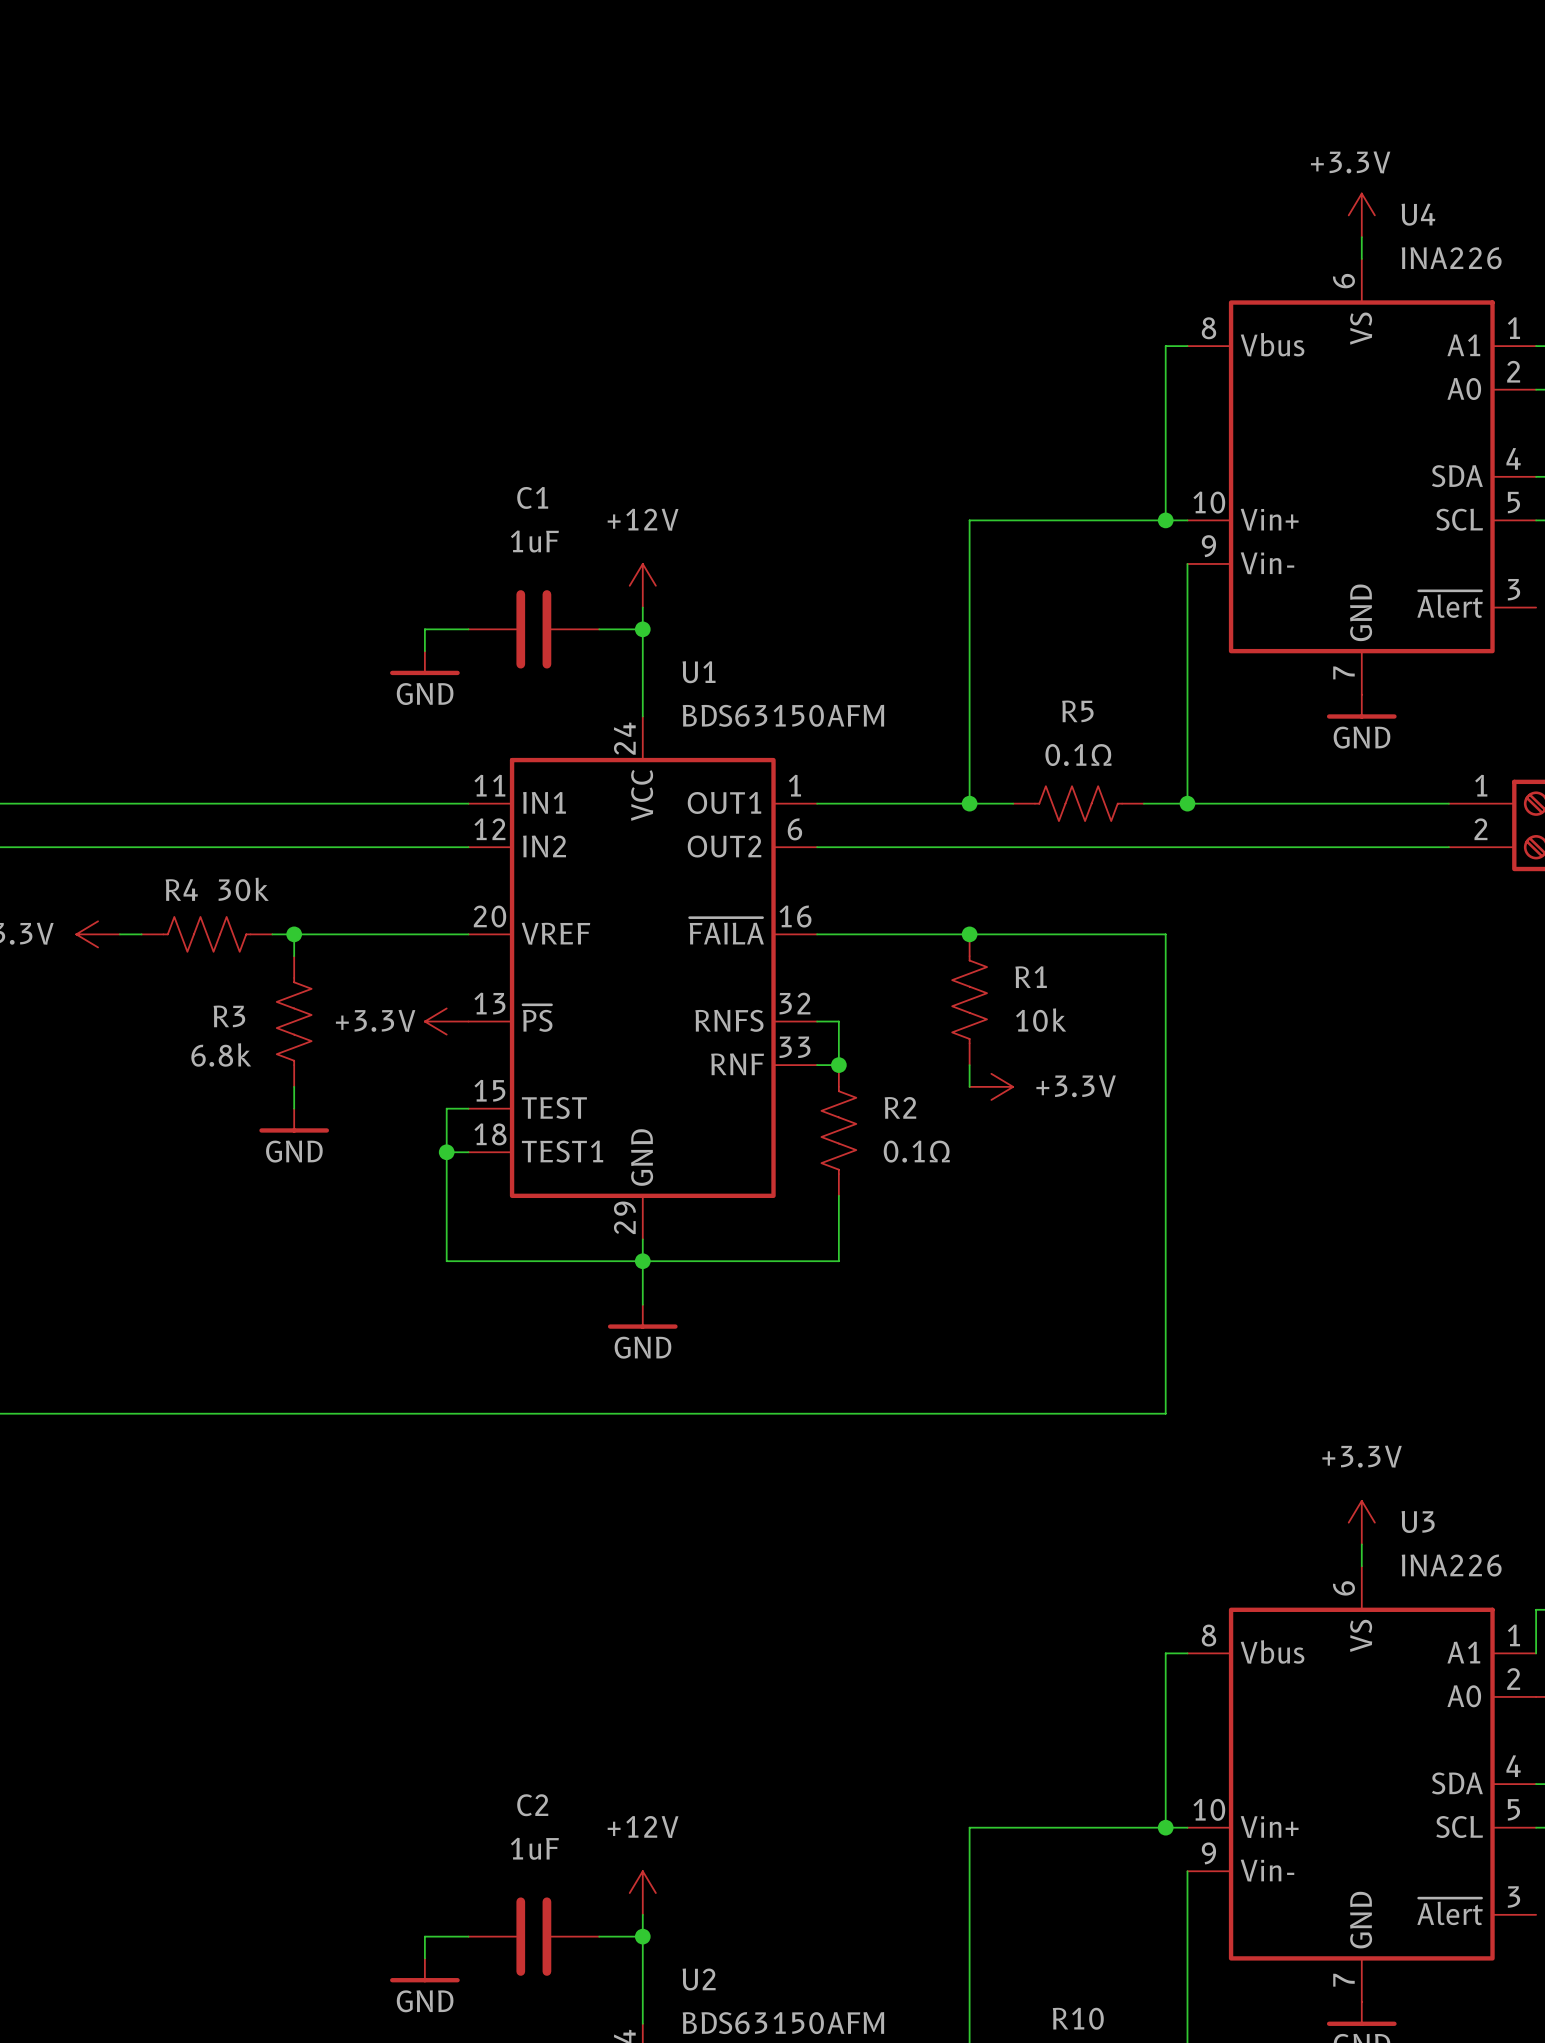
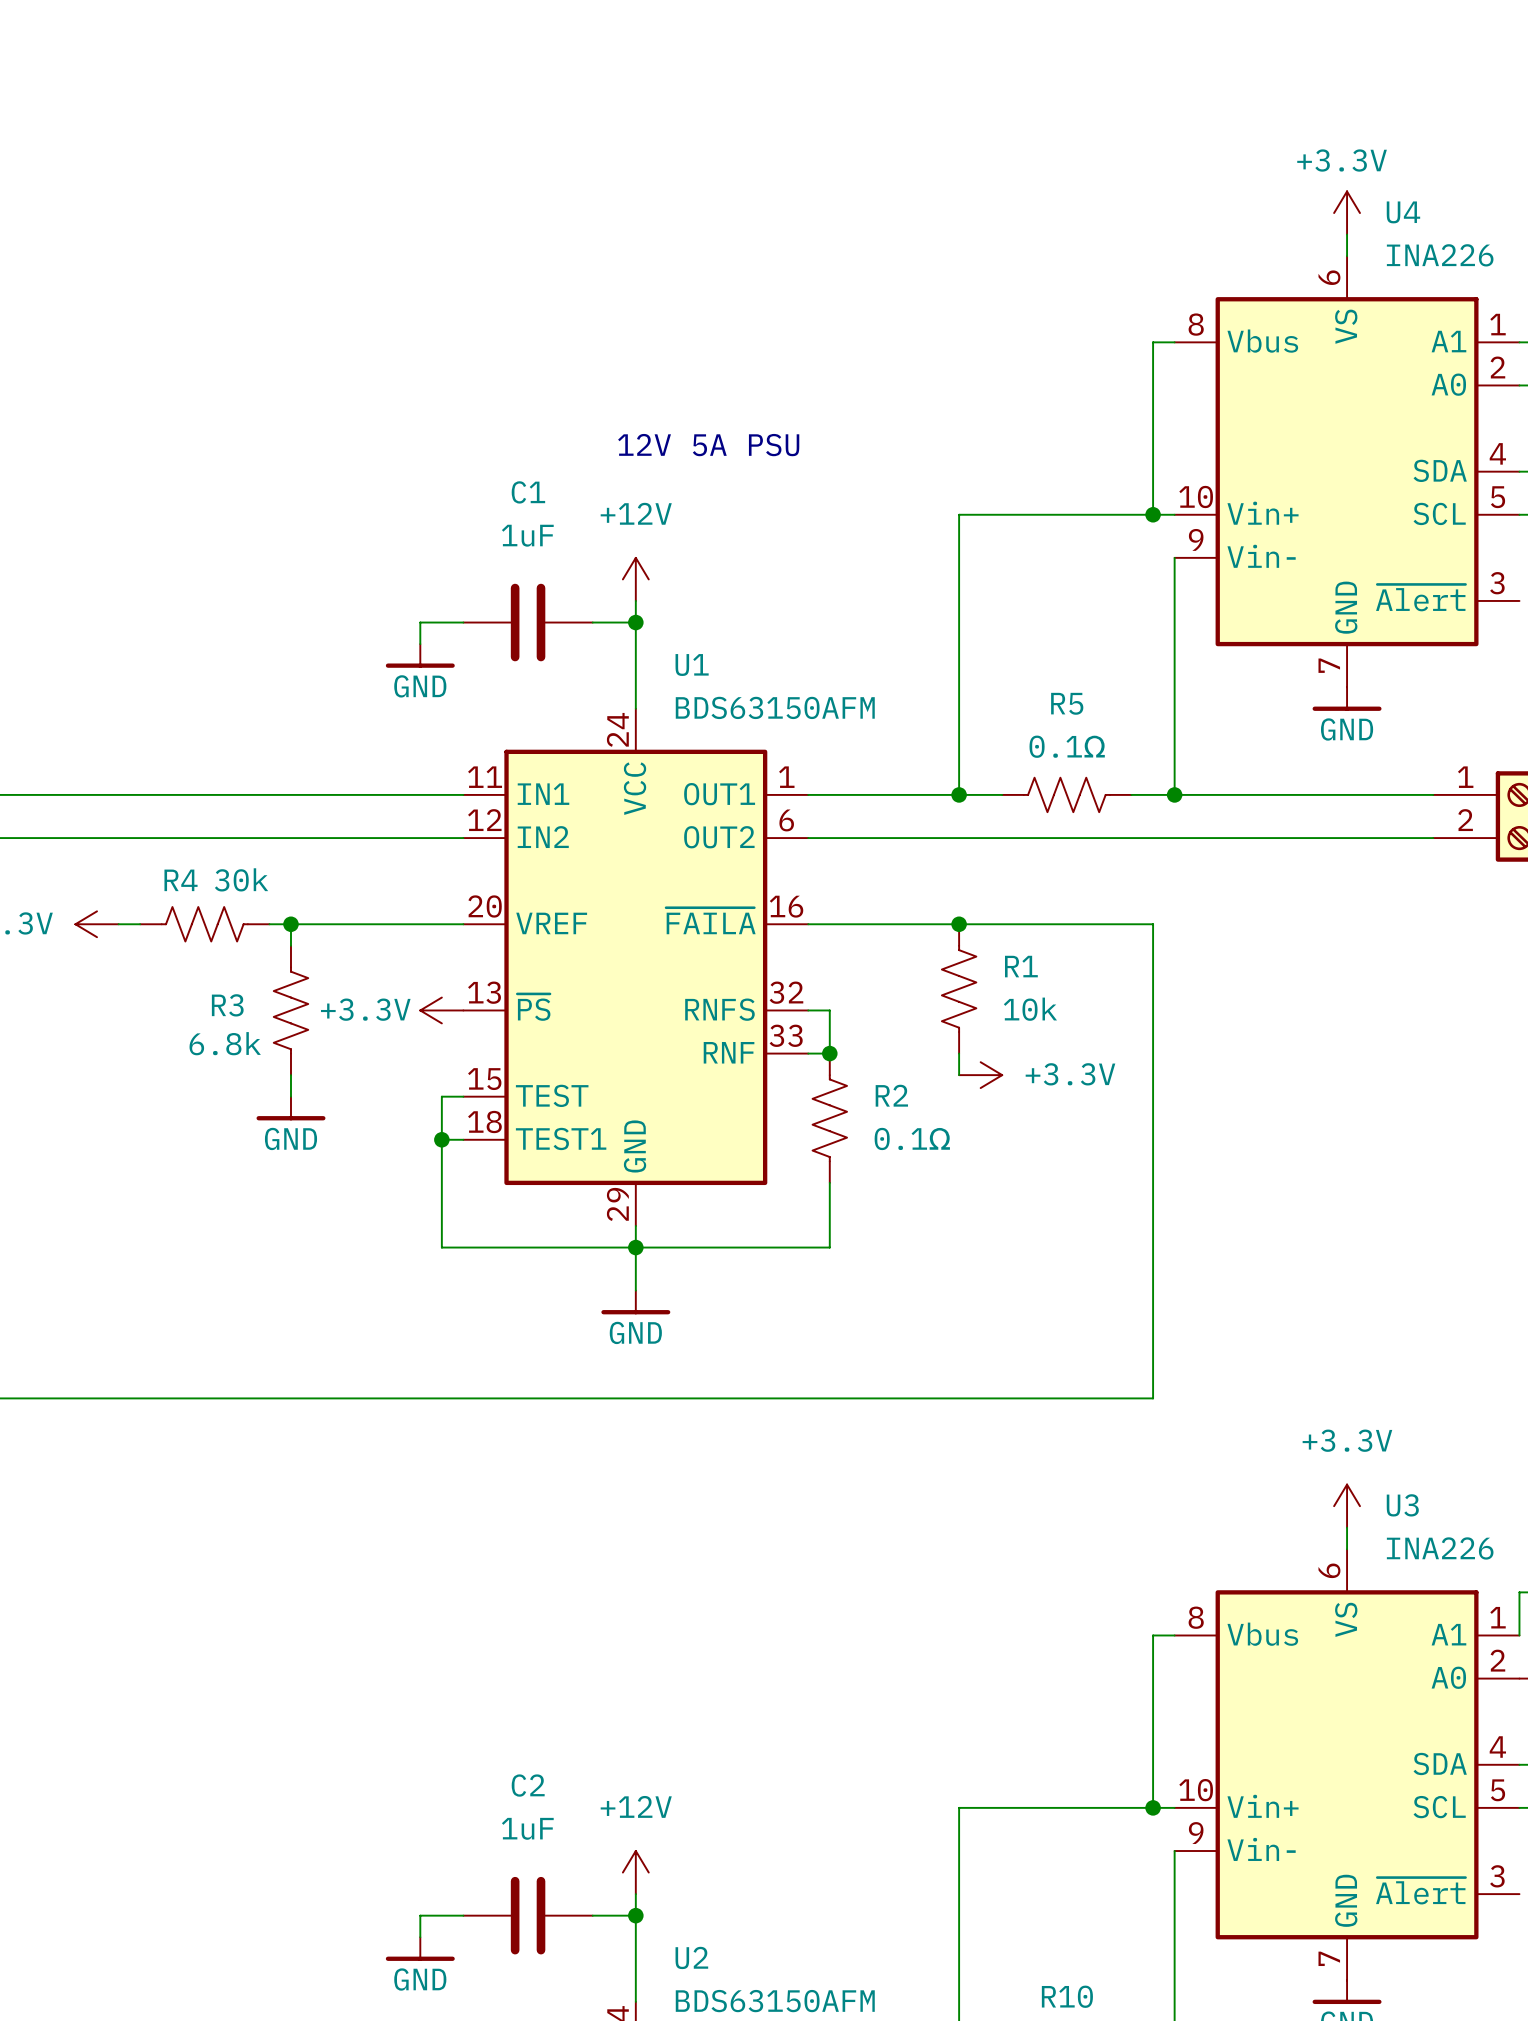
text: none -> 12V 5A PSU (708, 445)

